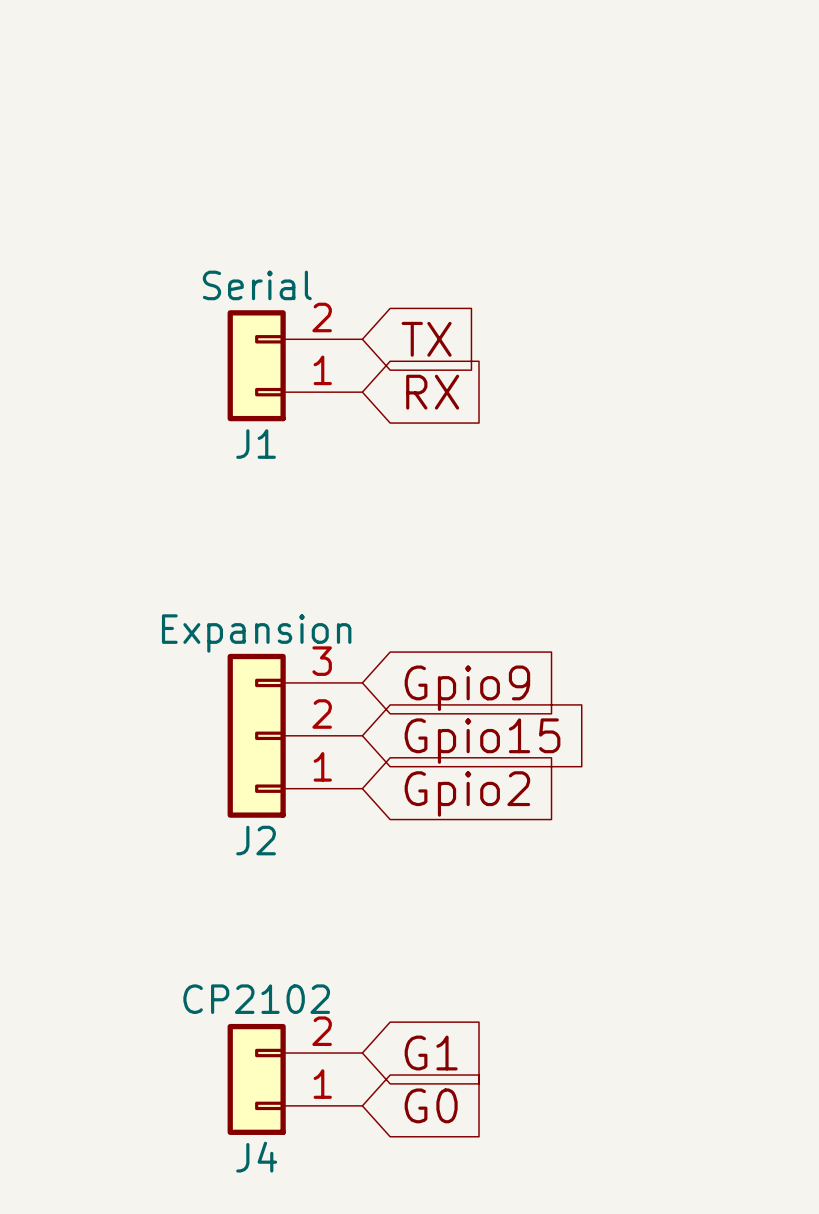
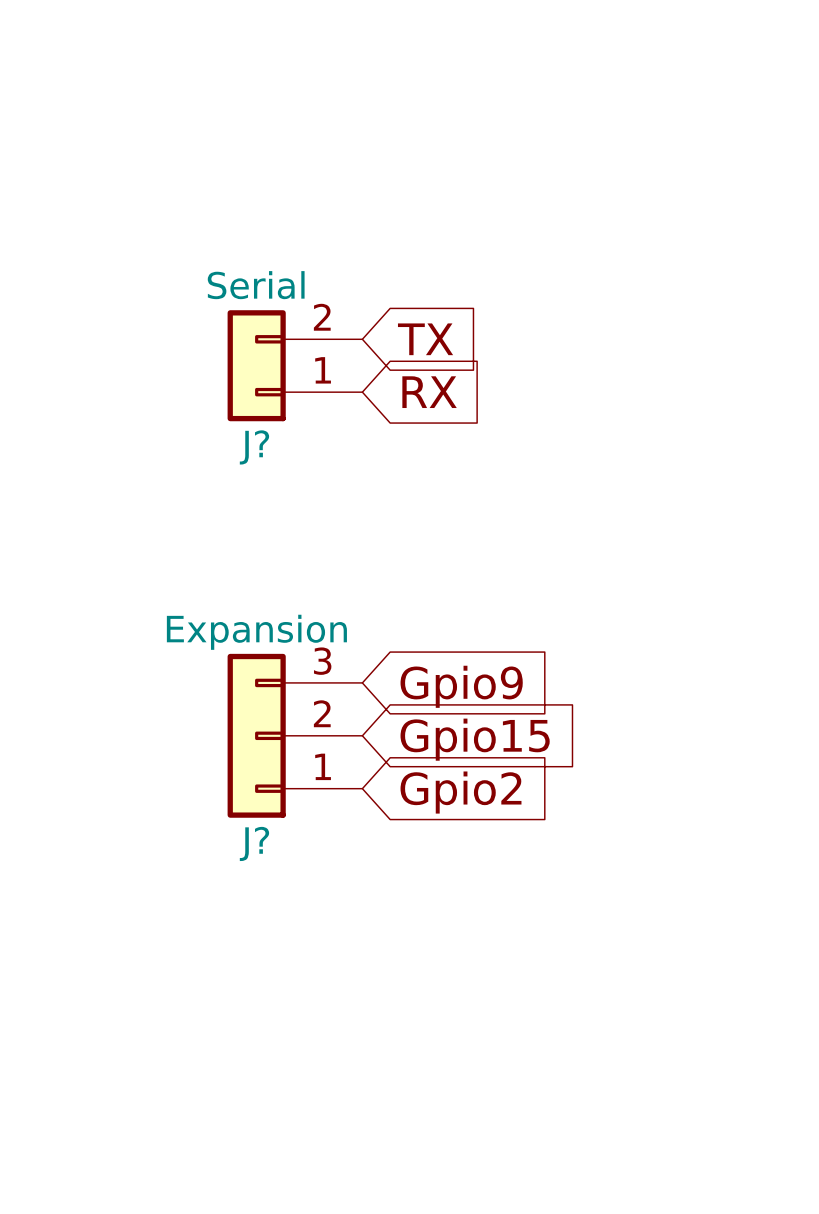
J1 name: J1 (256, 444) -> J? (254, 447)
J2 name: J2 (256, 840) -> J? (254, 843)
global label: G1 (431, 1053) -> none
J4: CP2102 (295, 1079) -> none
global label: G0 (431, 1105) -> none

